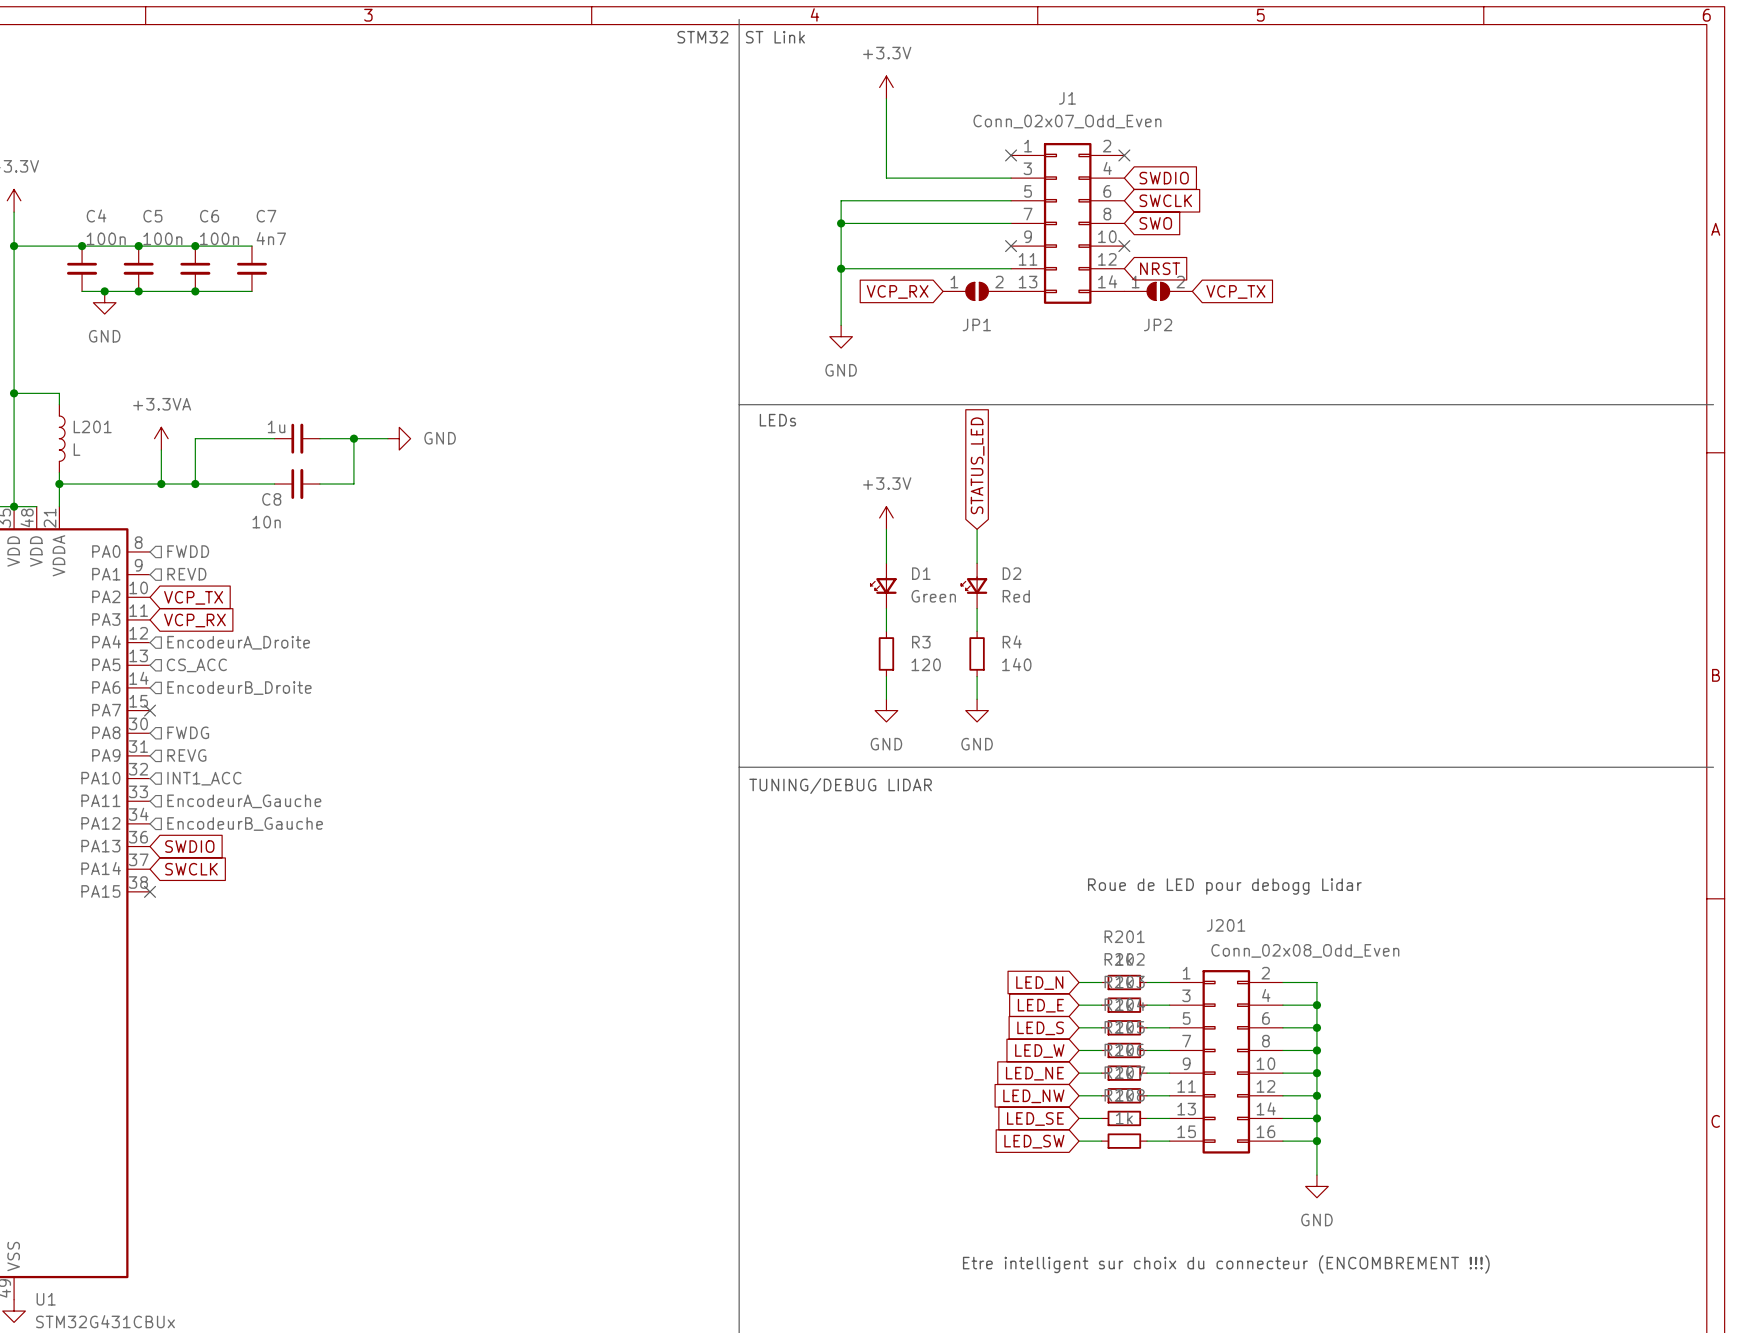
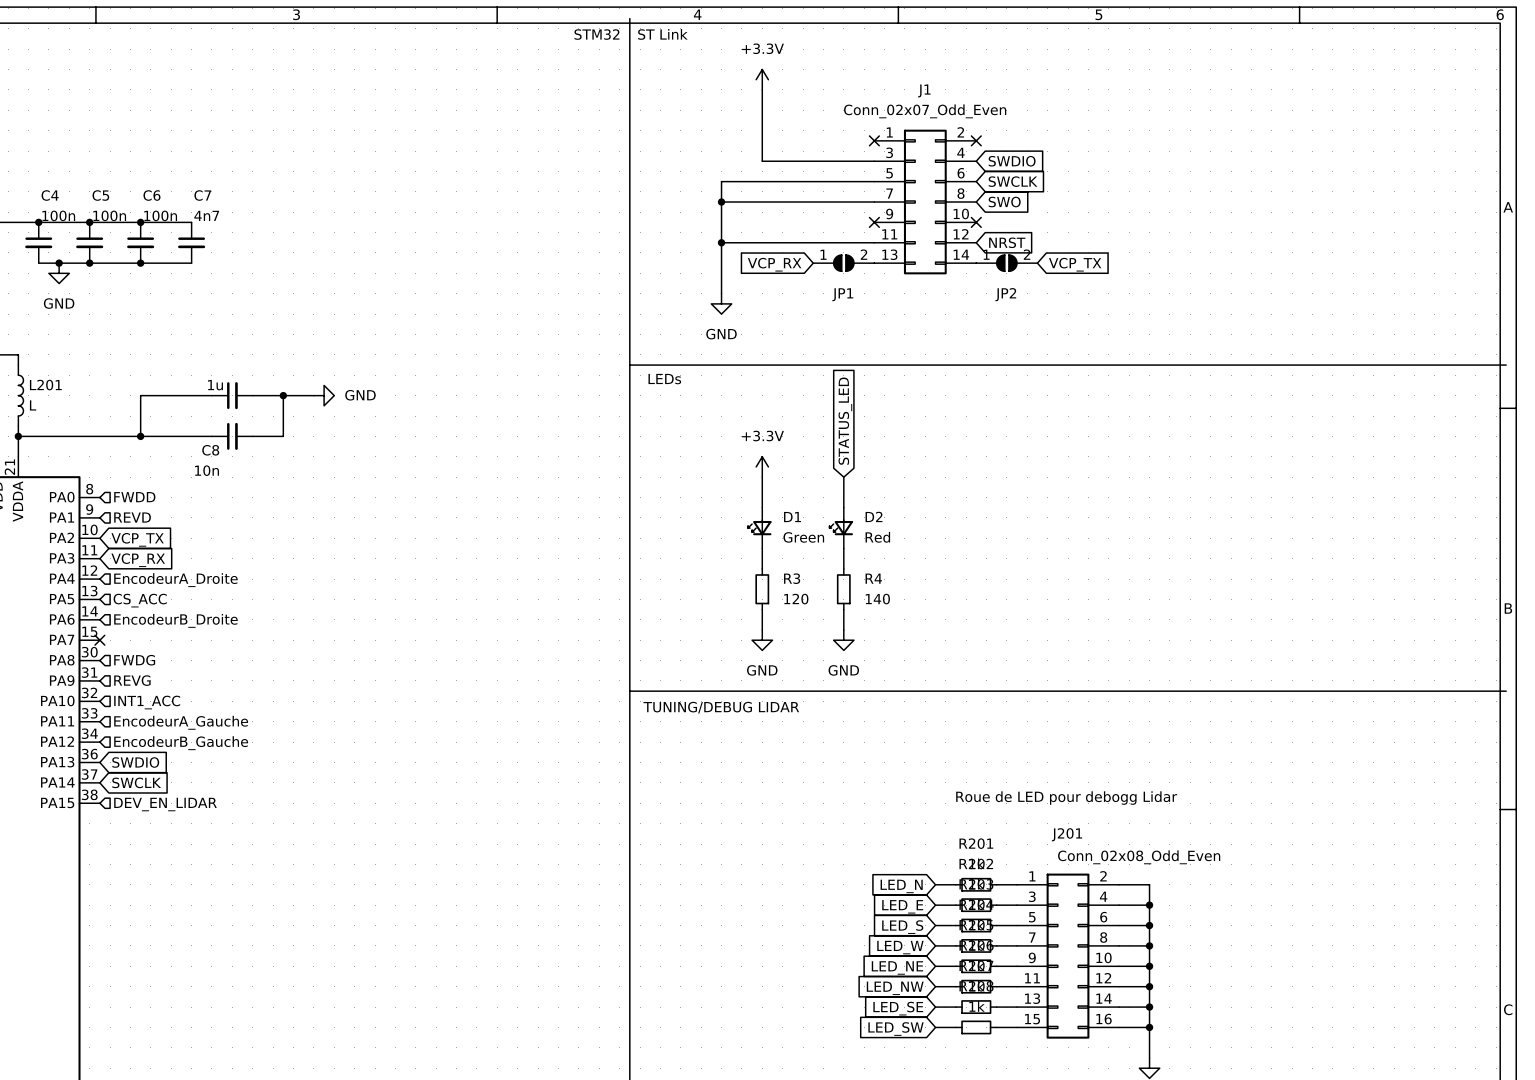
power symbol: +3.3VA (161, 438) -> none
wire: (161, 450) (161, 484) -> none
junction: (161, 484) -> none
no-connect mark: (150, 891) -> none
hierarchical label: none -> DEV_EN_LIDAR (165, 804)

